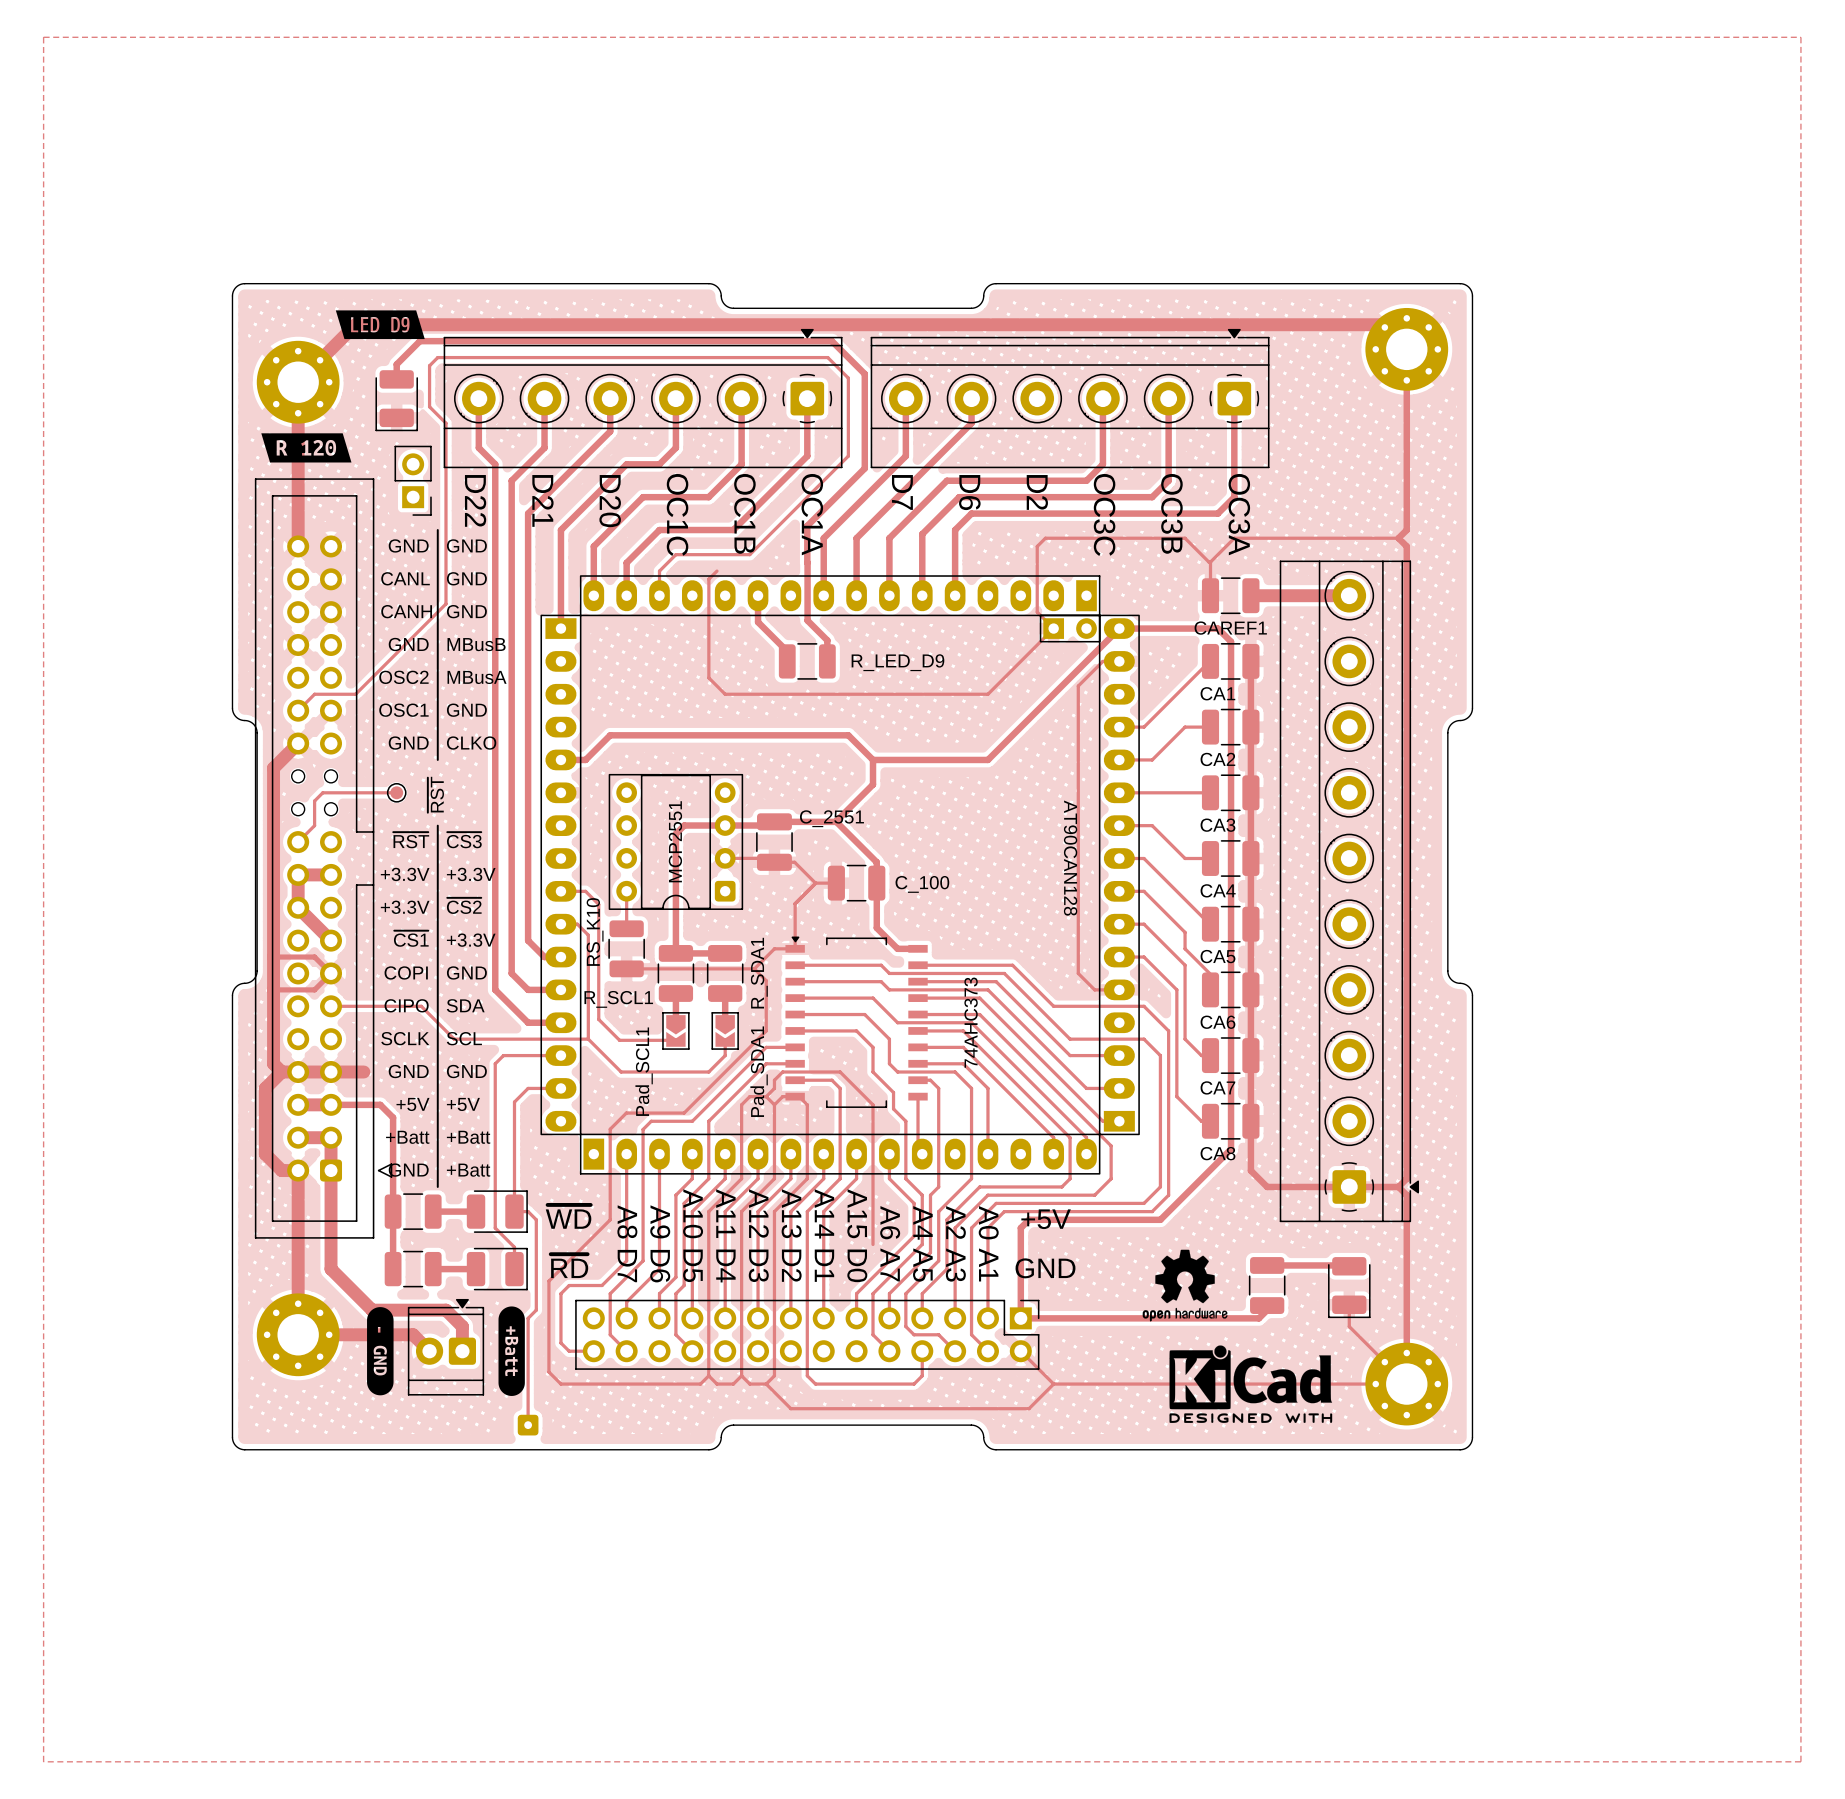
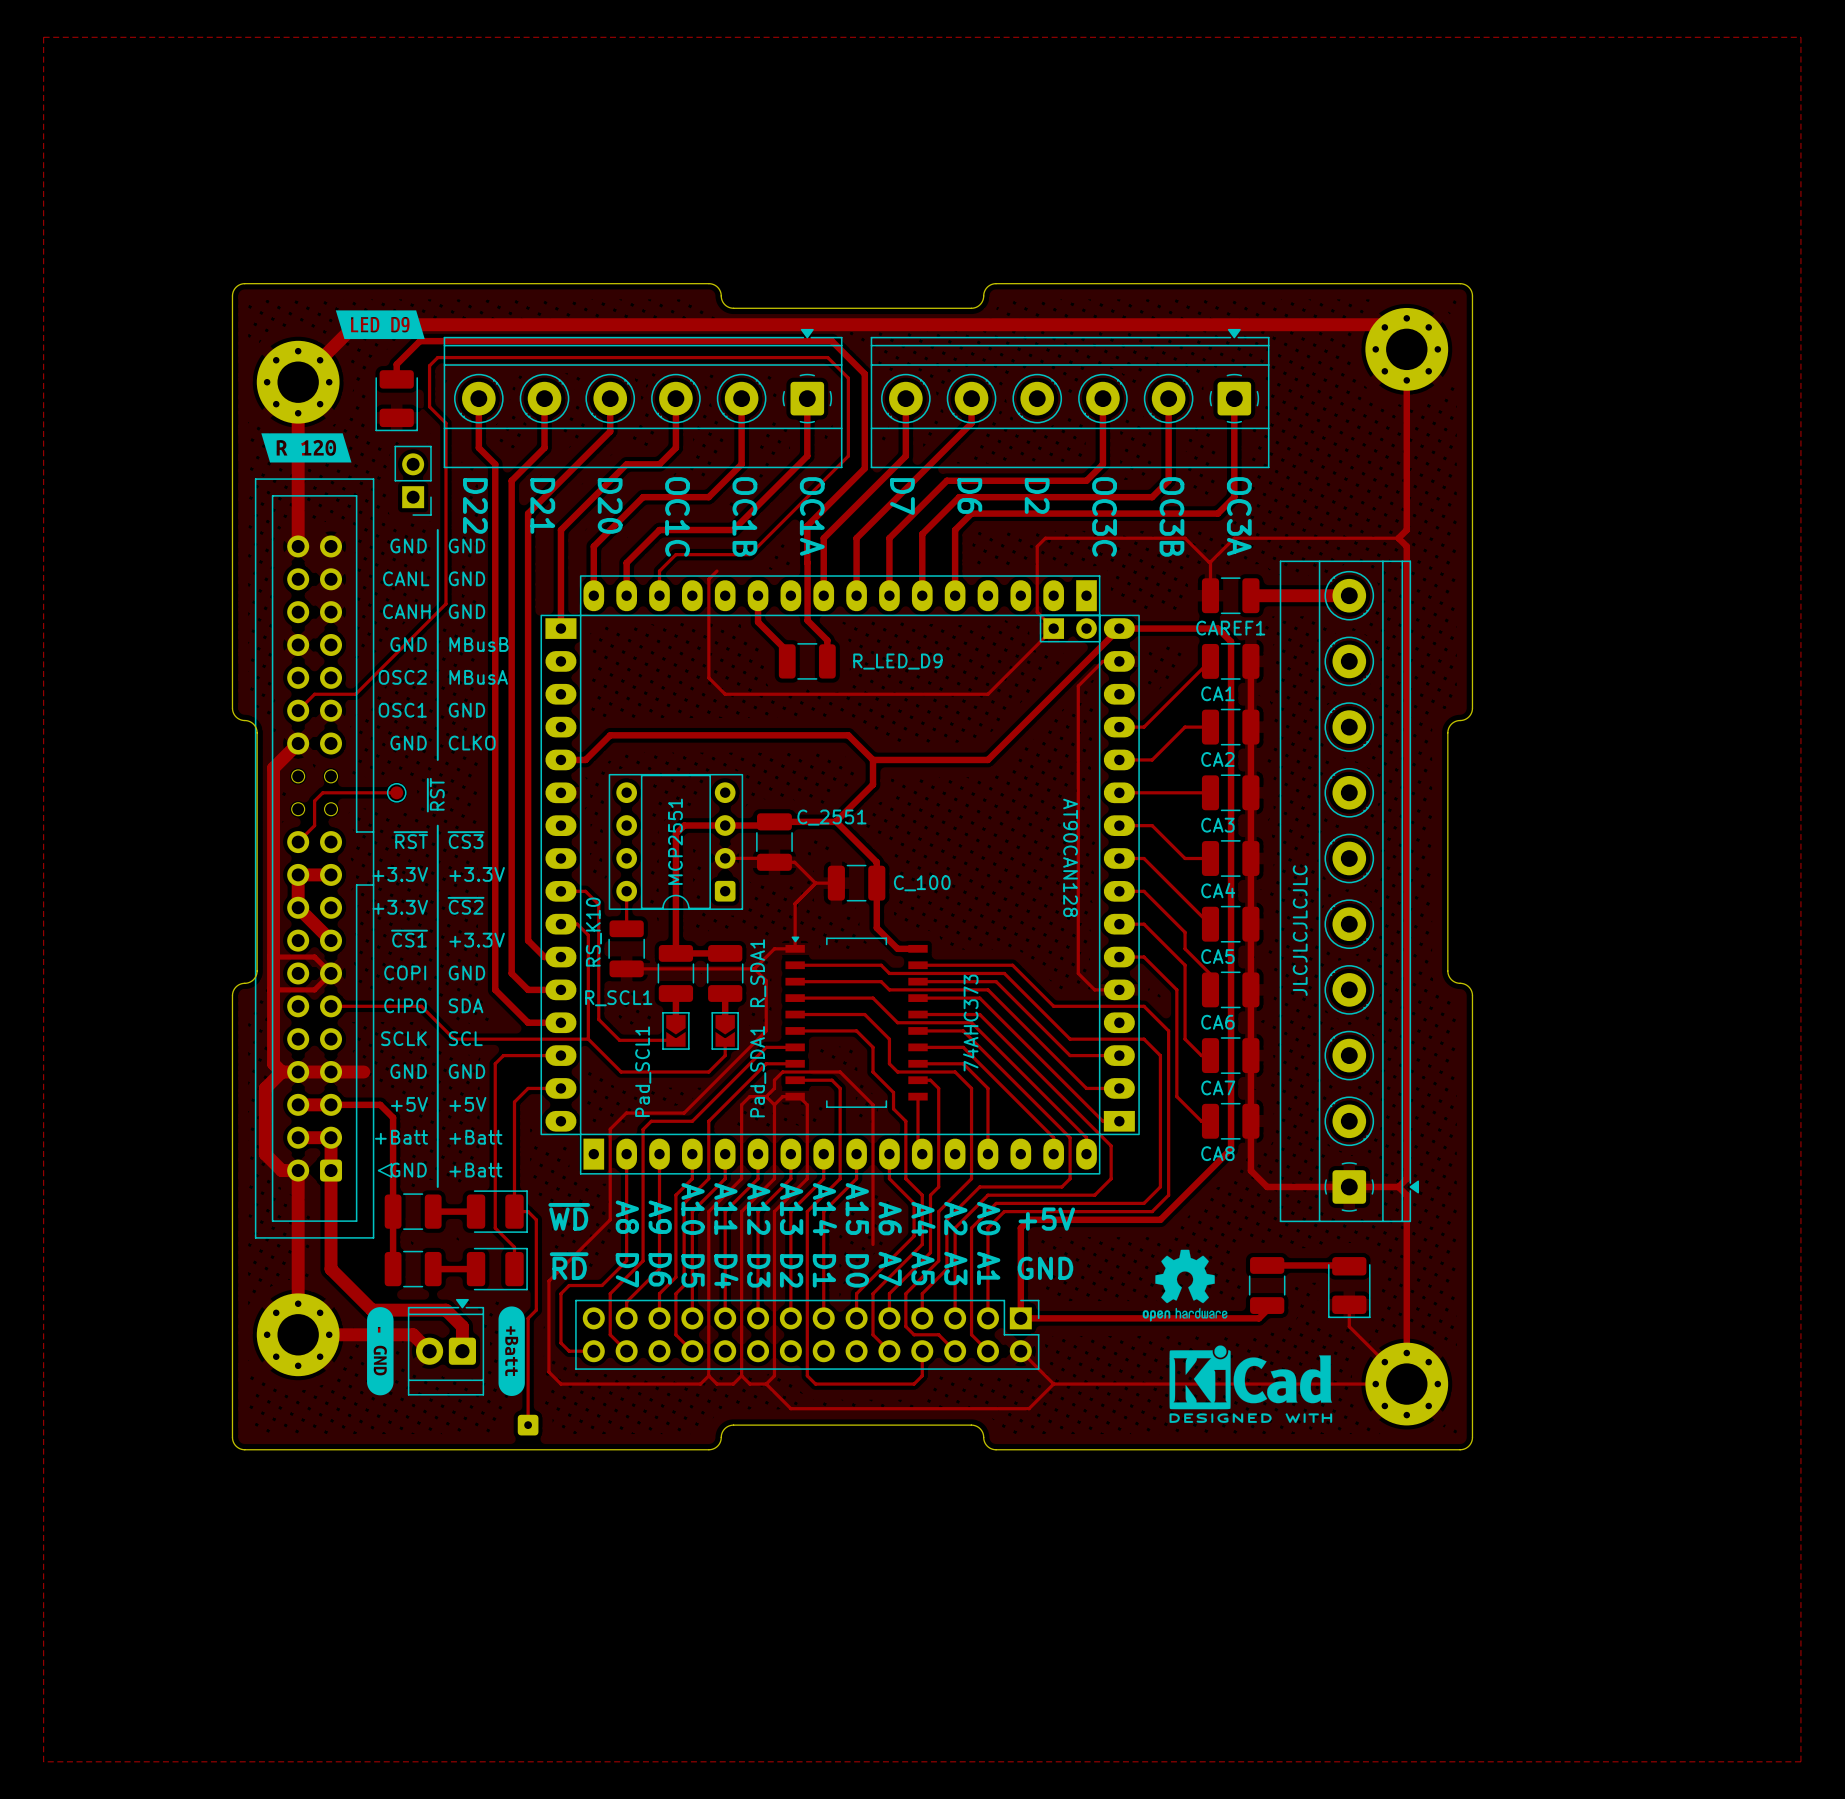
text: none -> JLCJLCJLCJLC (1300, 930)

